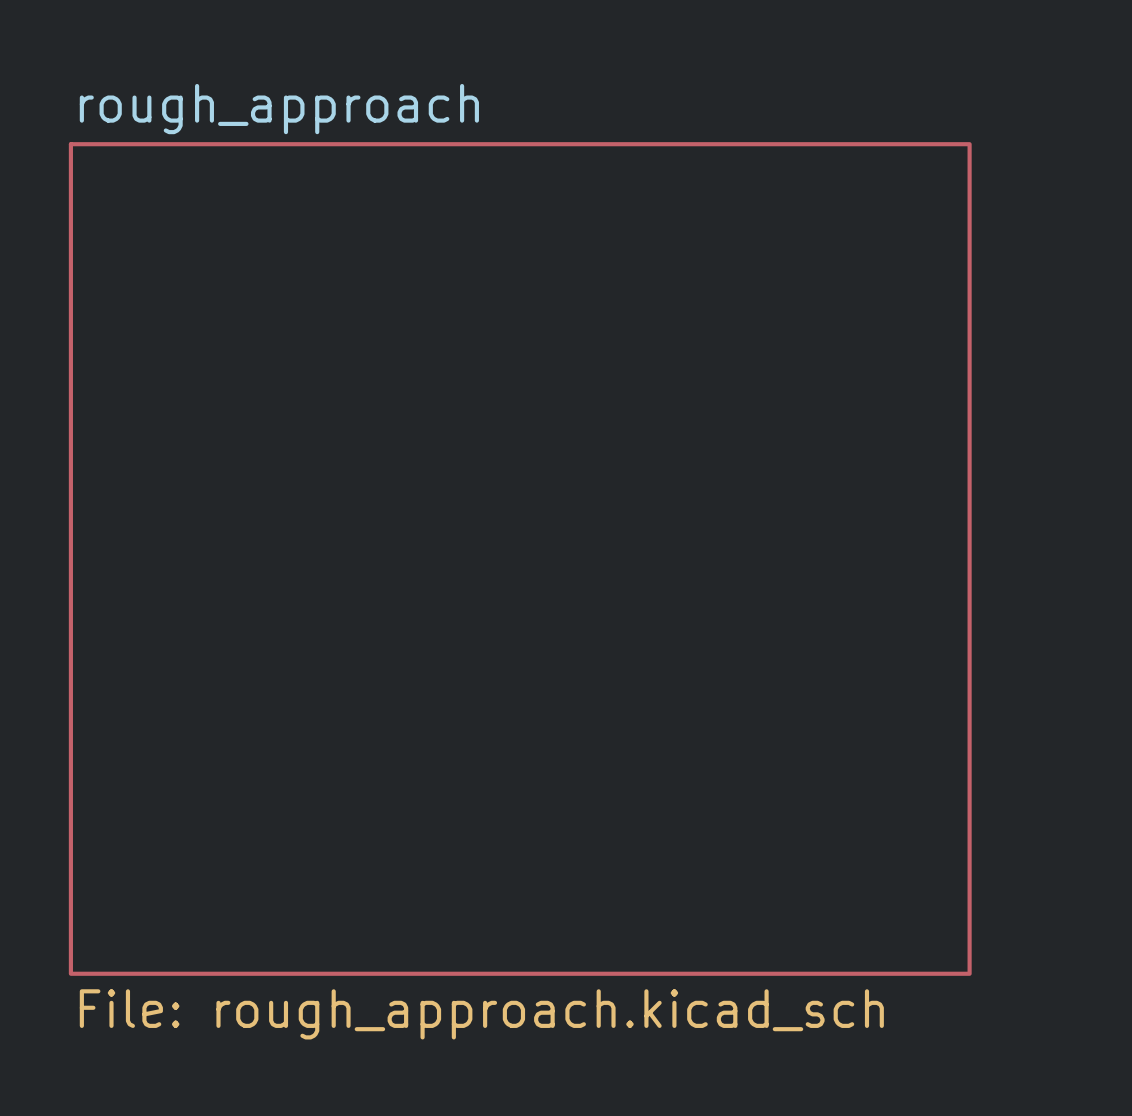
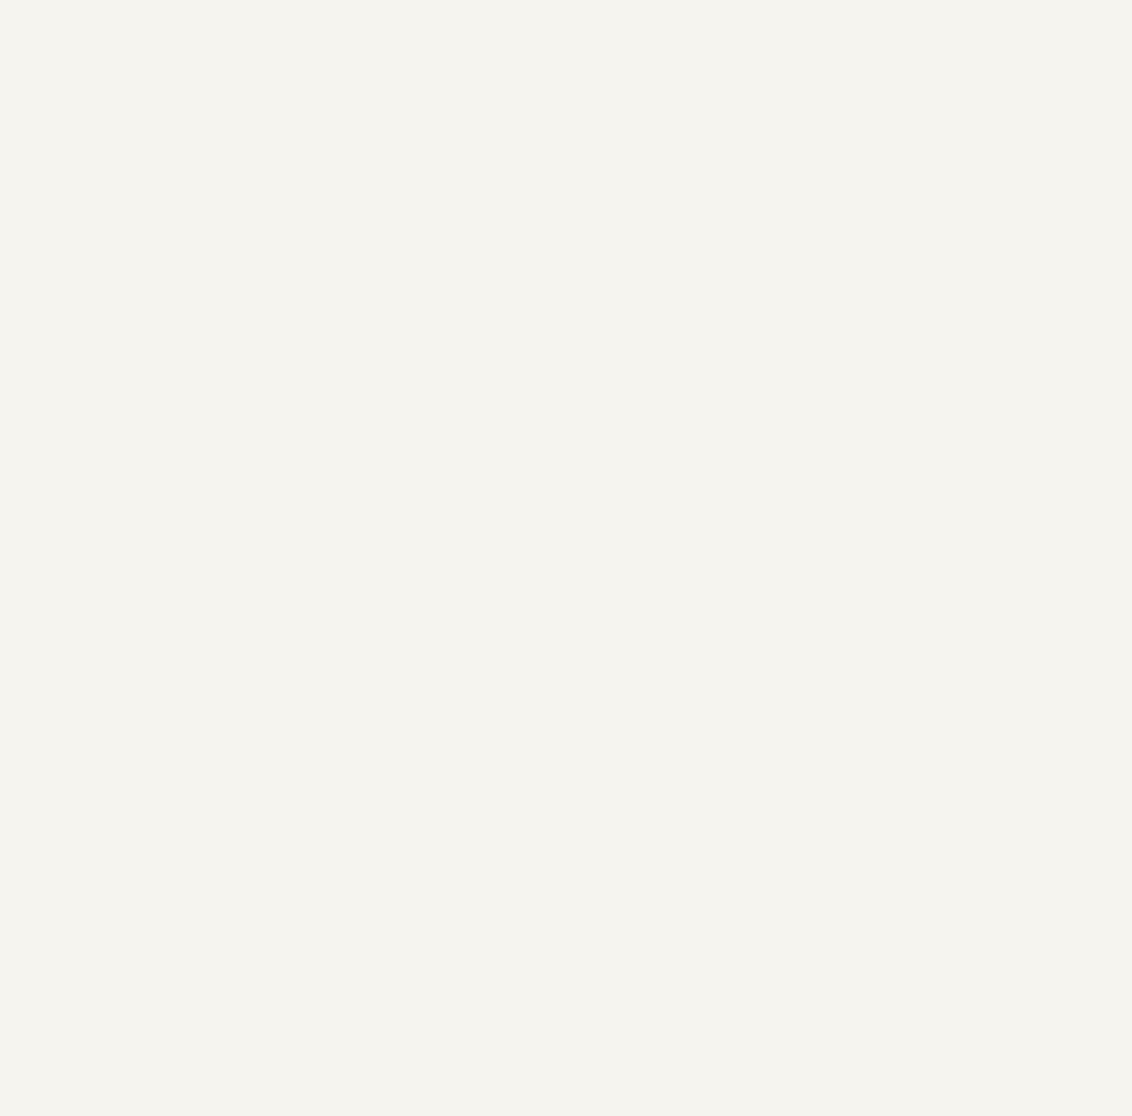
sheet rough_approach: File: rough_approach.kicad_sch (520, 558) -> none

